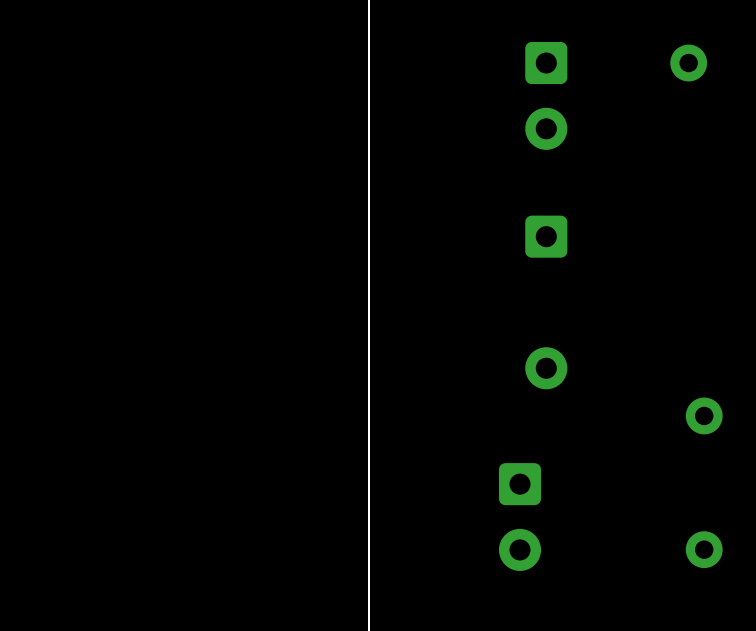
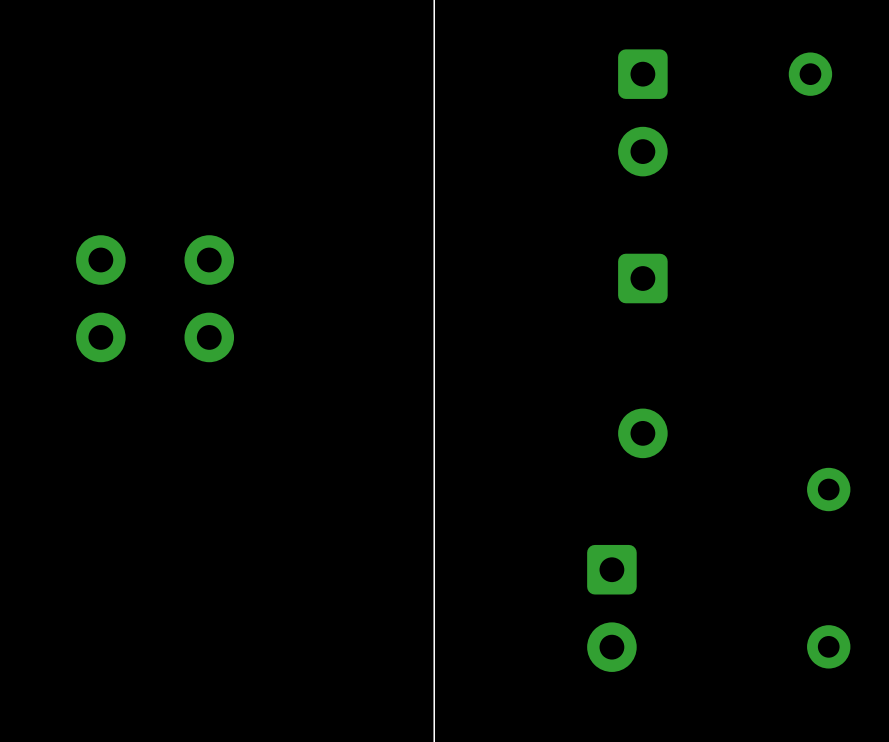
part: none -> (100, 298)
part: none -> (209, 298)

